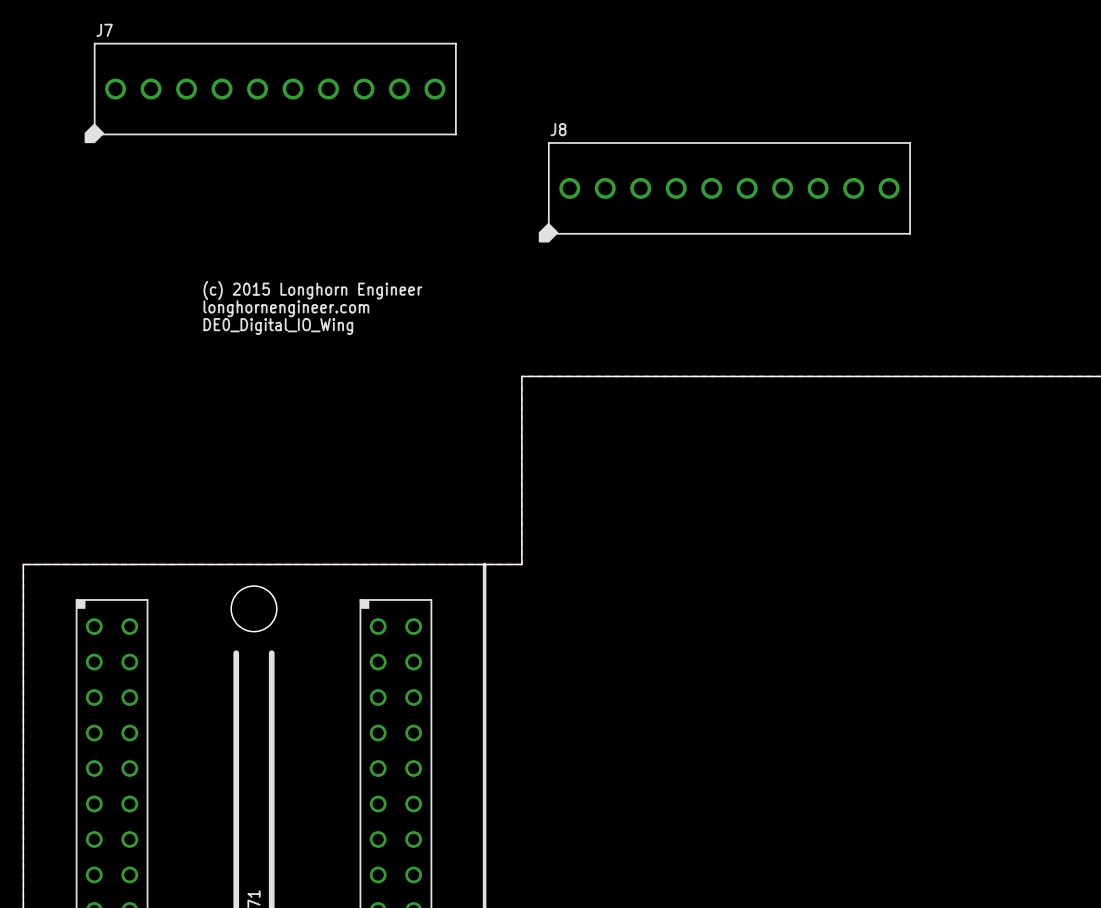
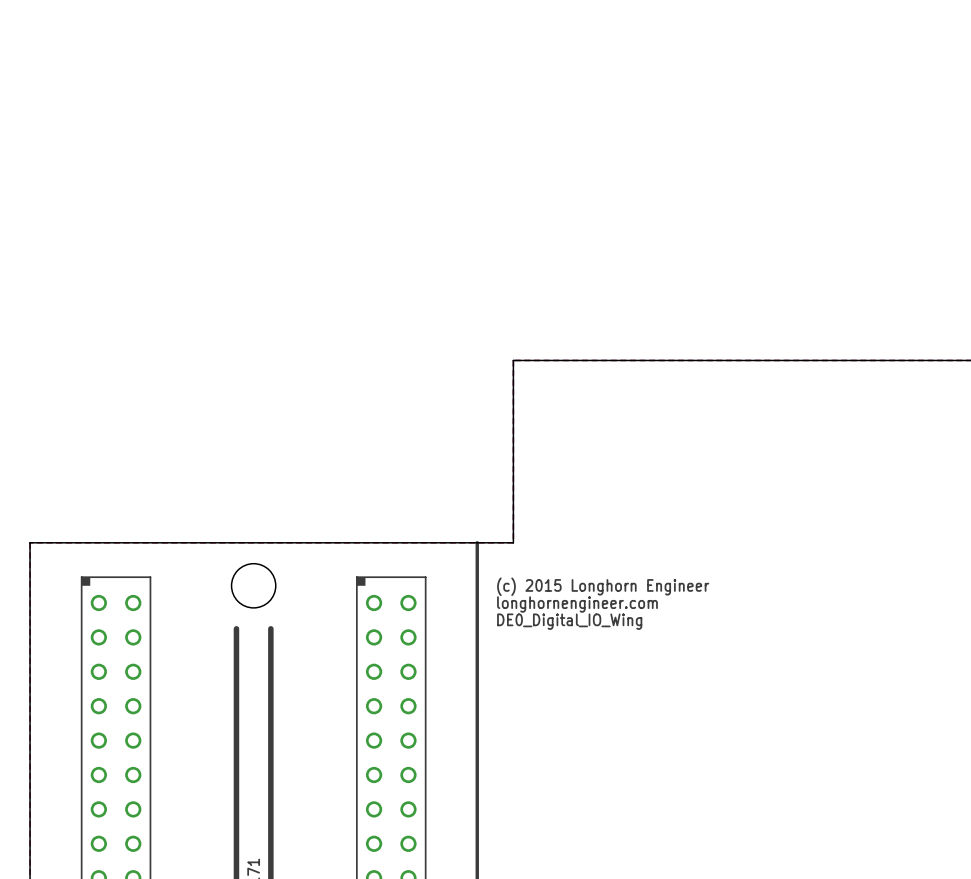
J7: (270, 92) -> none
J8: (724, 192) -> none
drawing: [203, 280, 423, 336] -> none
drawing: none -> [497, 577, 710, 630]

